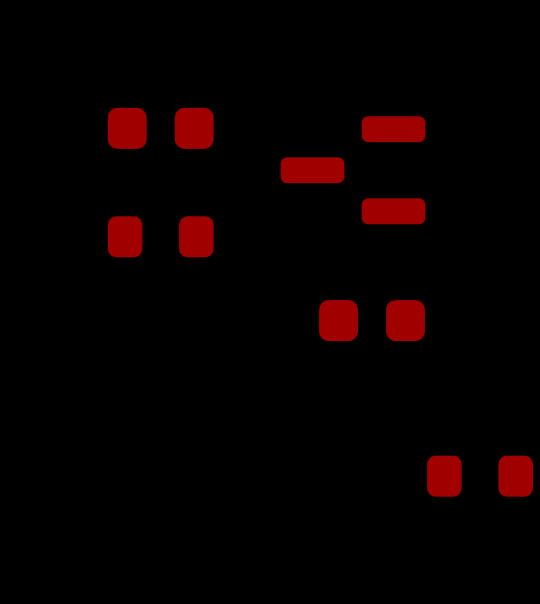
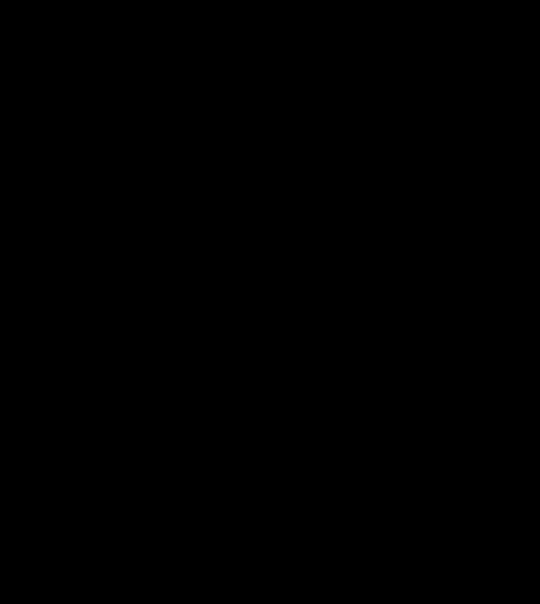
part: (160, 128) -> none
part: (353, 170) -> none
part: (160, 236) -> none
part: (372, 320) -> none
part: (480, 476) -> none

